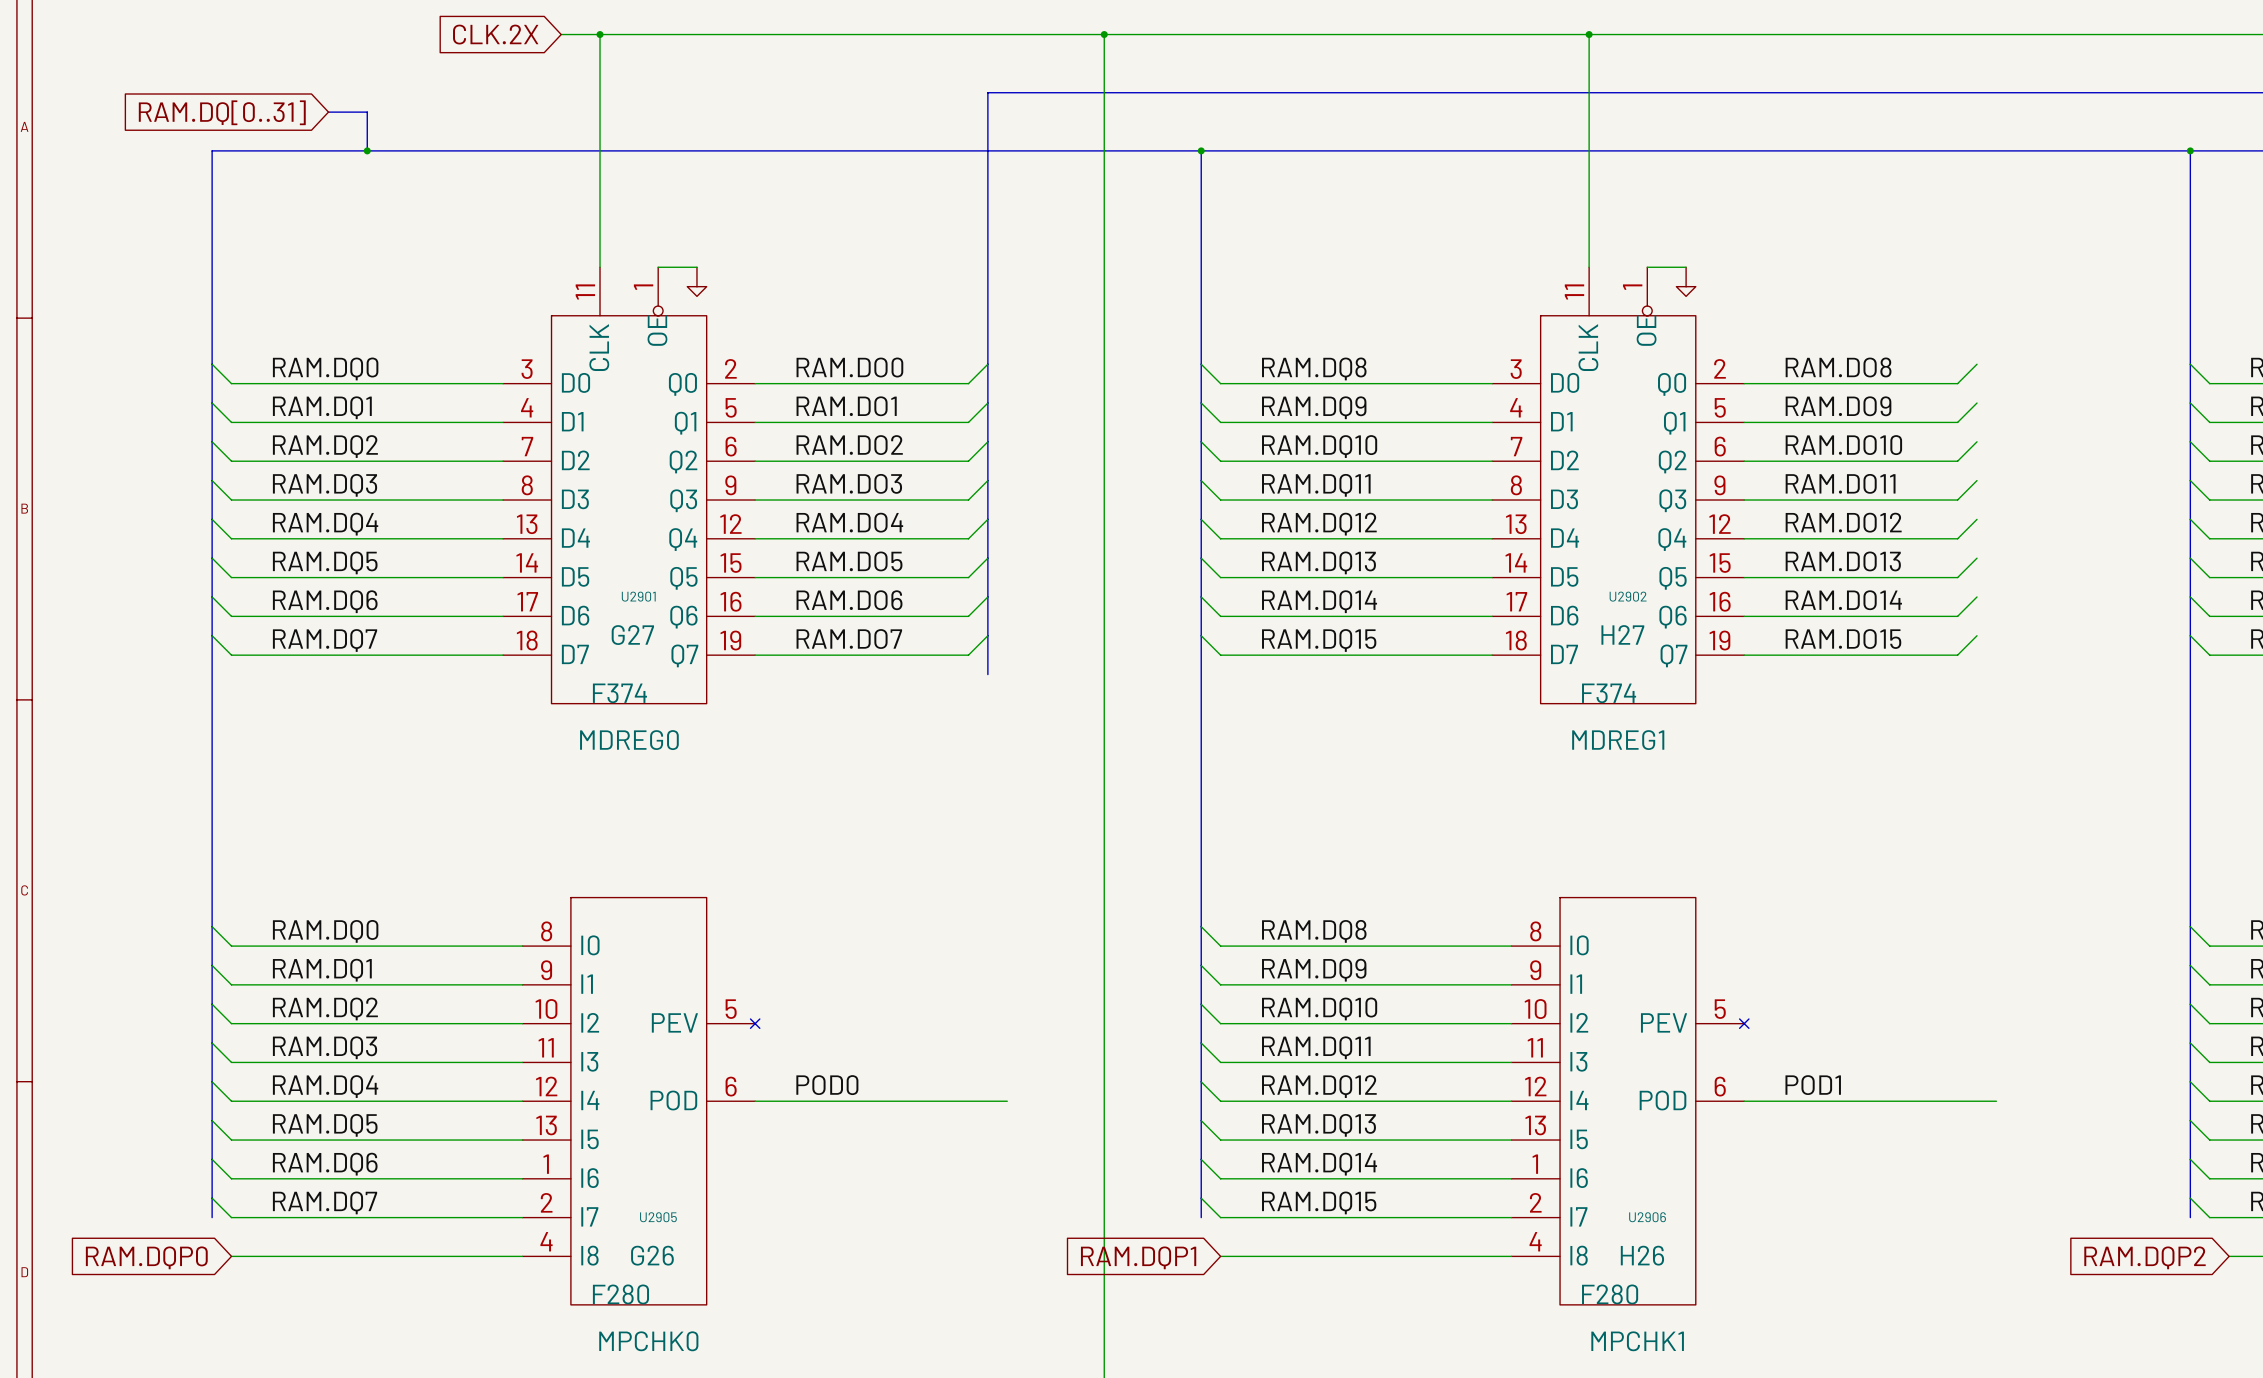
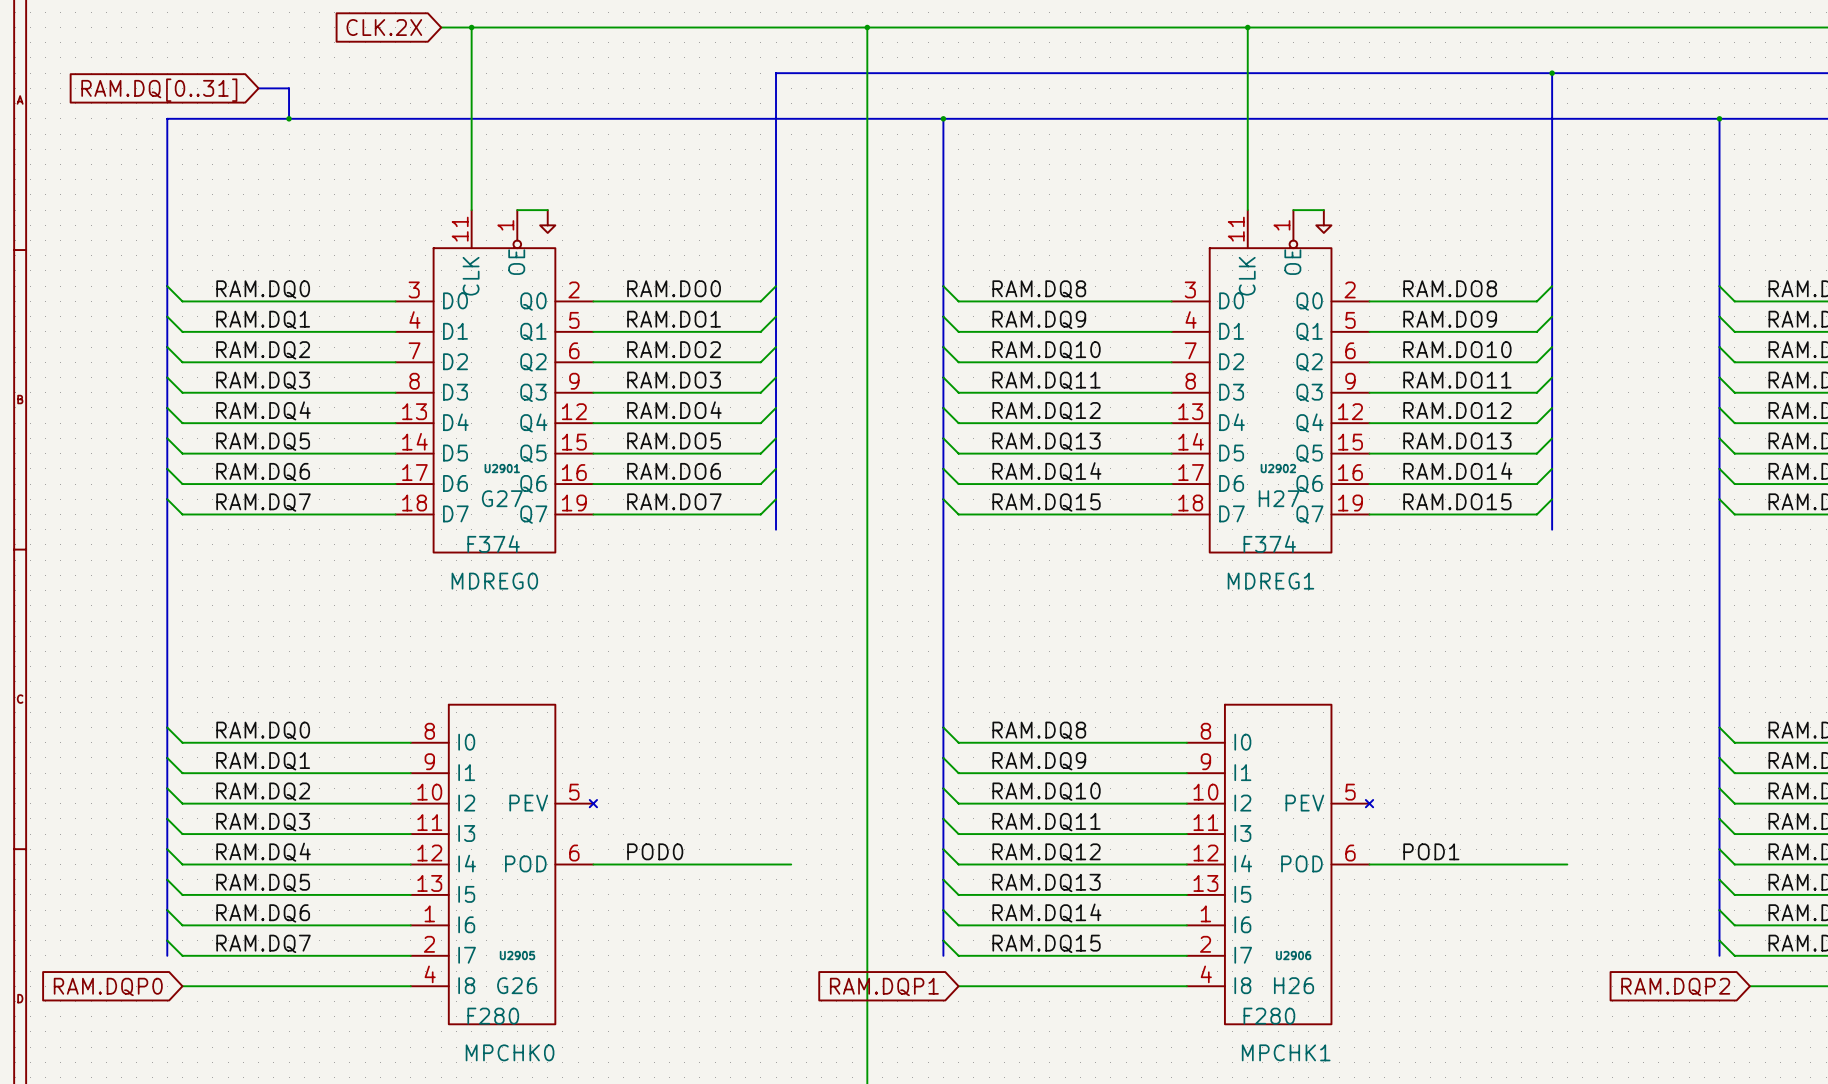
bus: none -> (1552, 73) (1552, 529)
junction: none -> (1552, 73)

